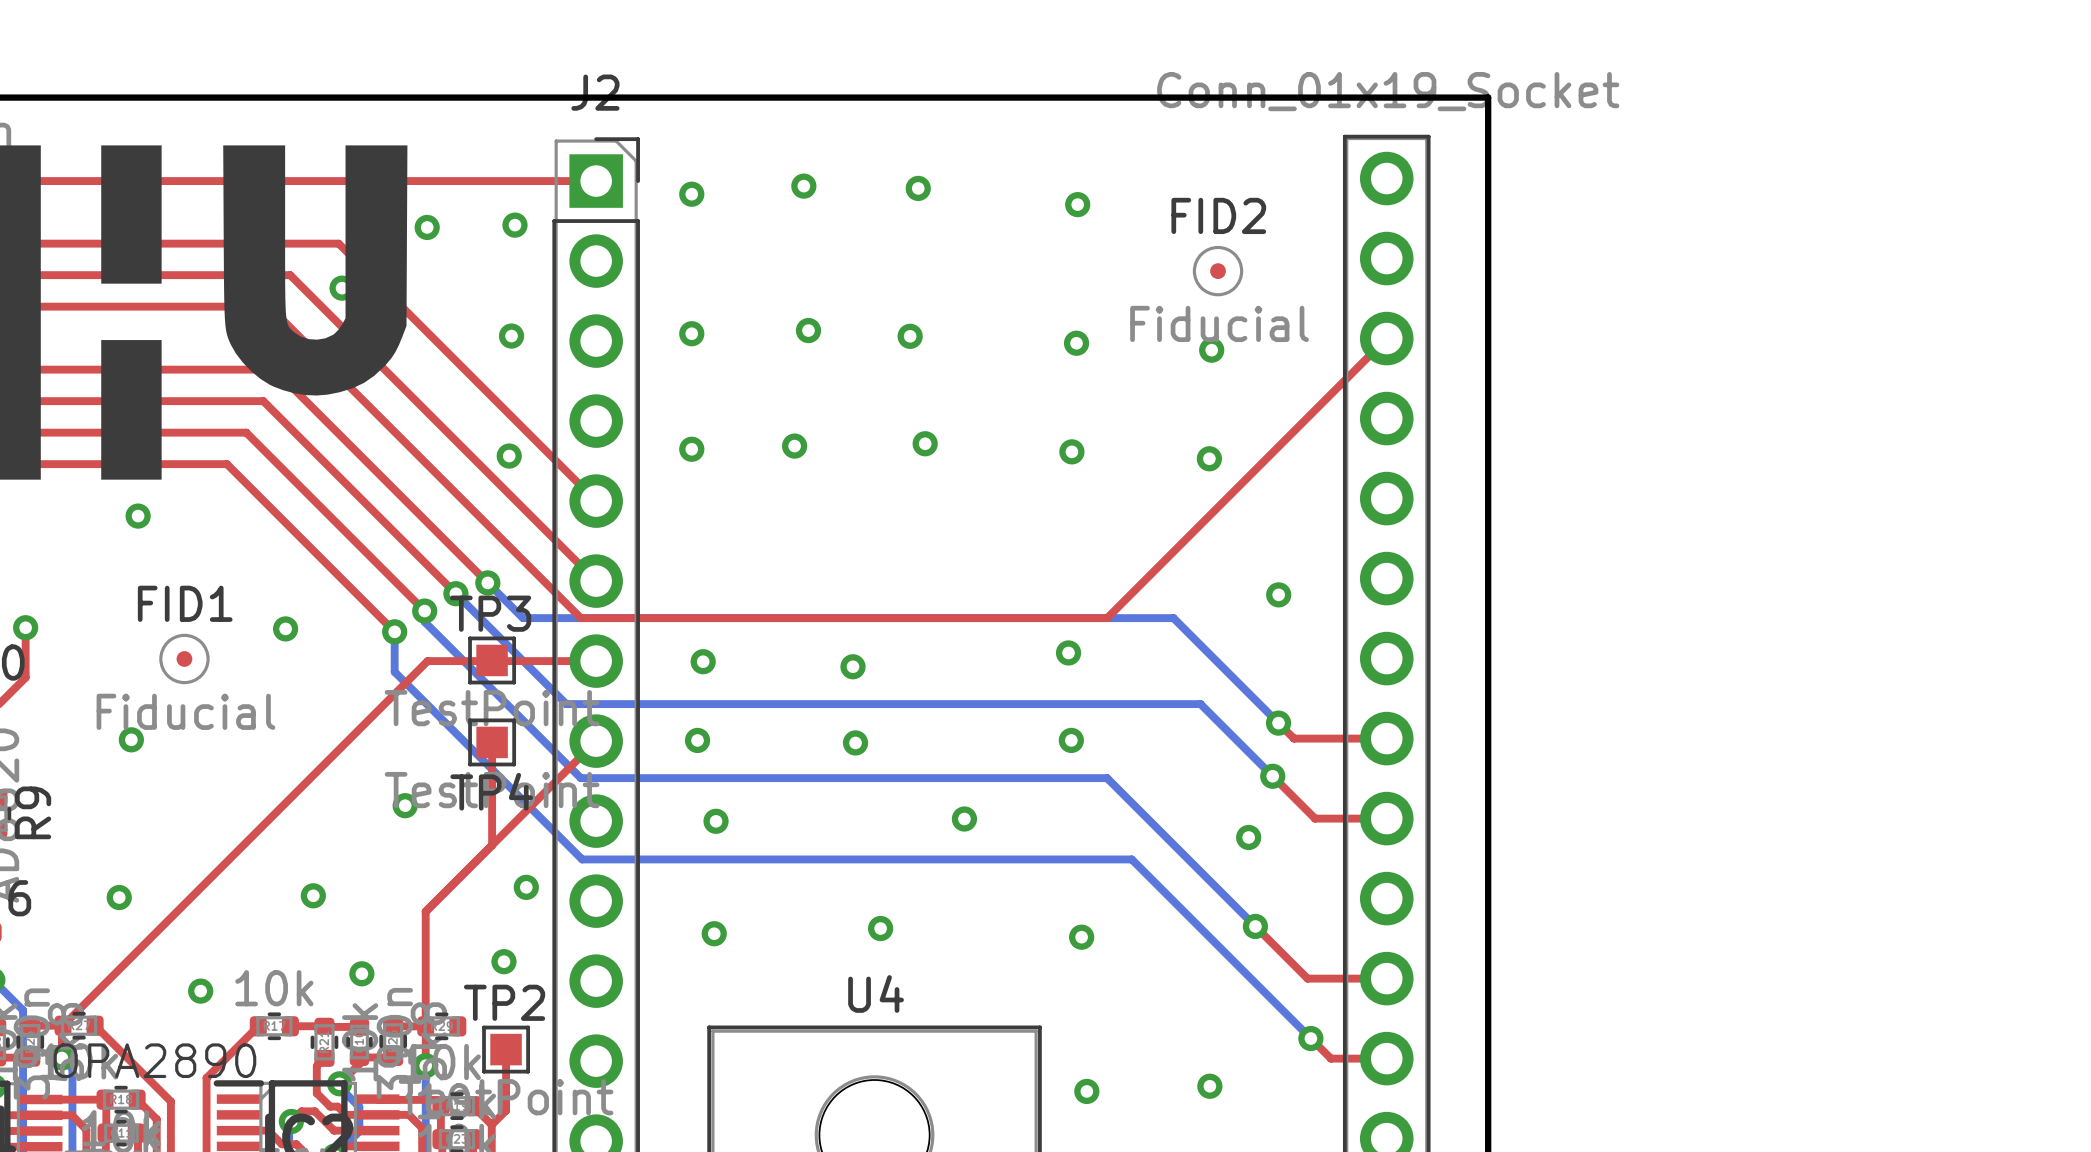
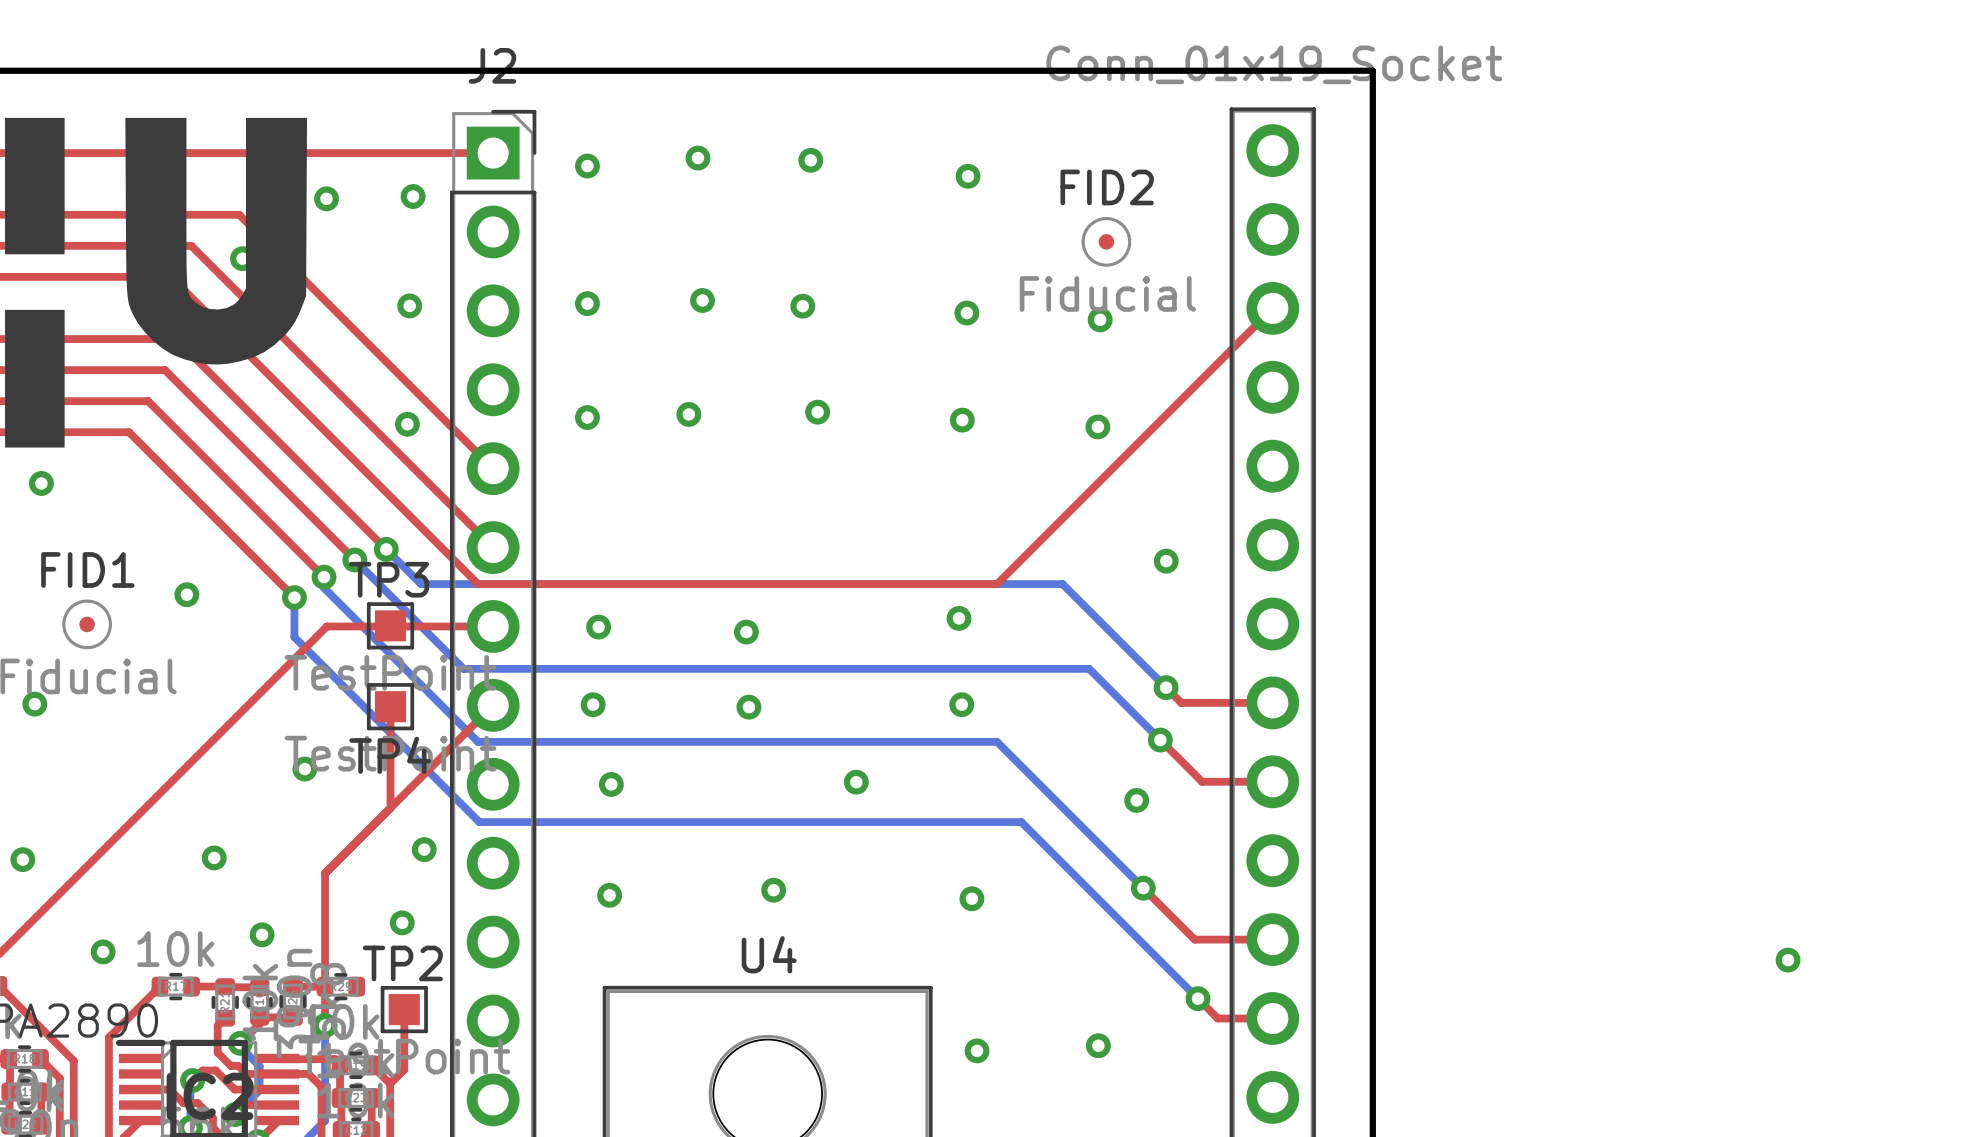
via: none -> (1788, 960)

